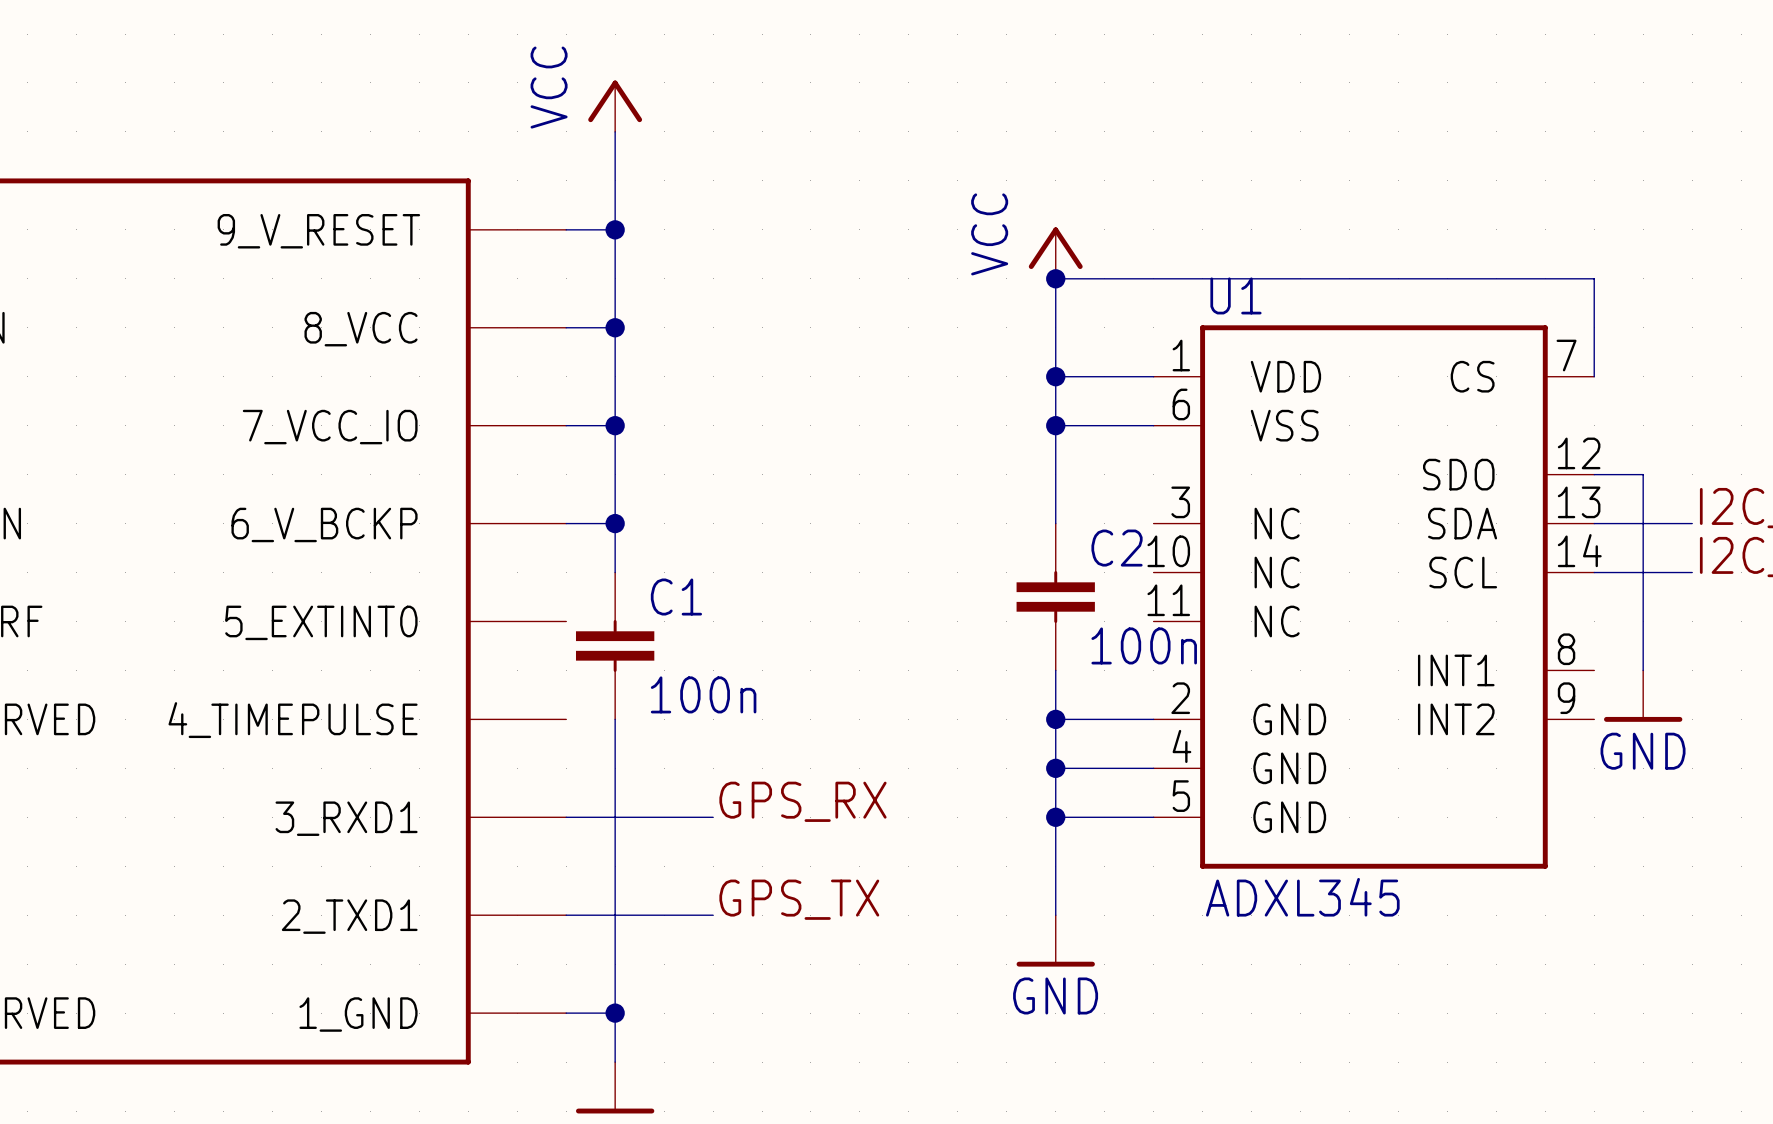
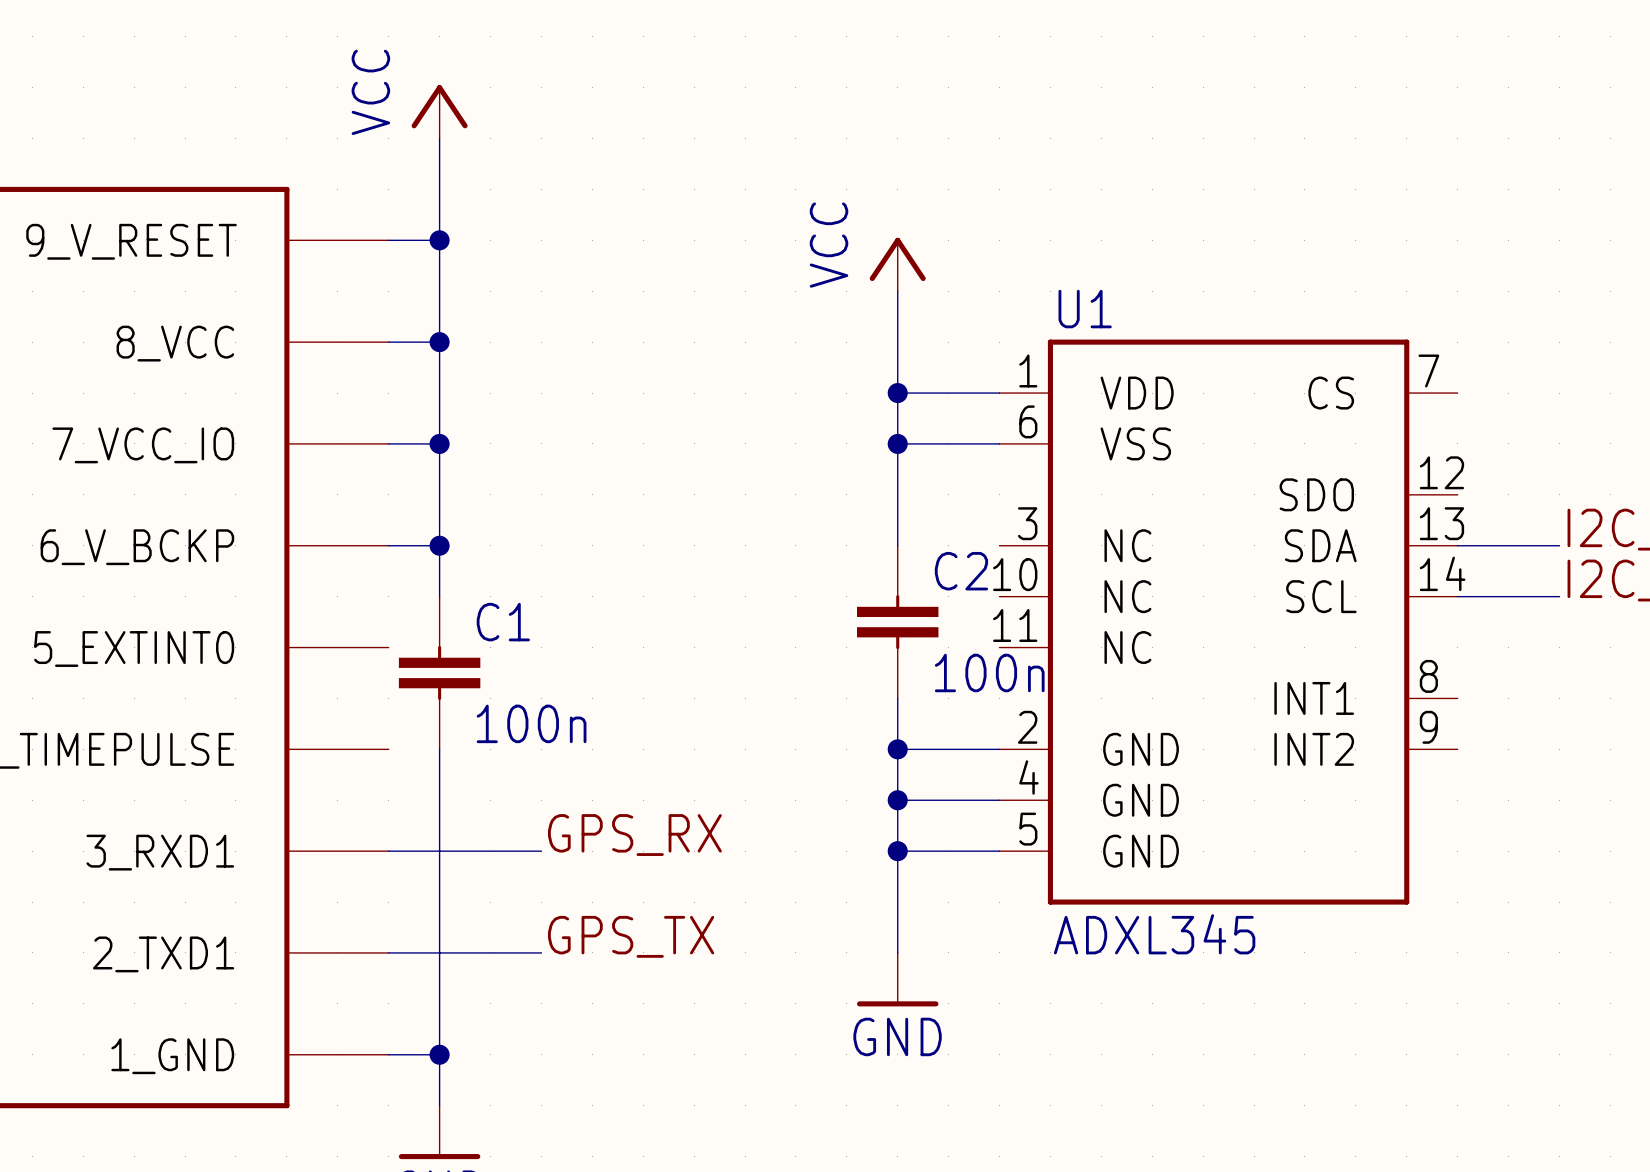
wire: (1055, 278) (1594, 278) (1594, 376) -> none
junction: (1055, 278) -> none
wire: (1594, 474) (1643, 474) (1643, 670) -> none
power symbol: GND (1643, 696) -> none

